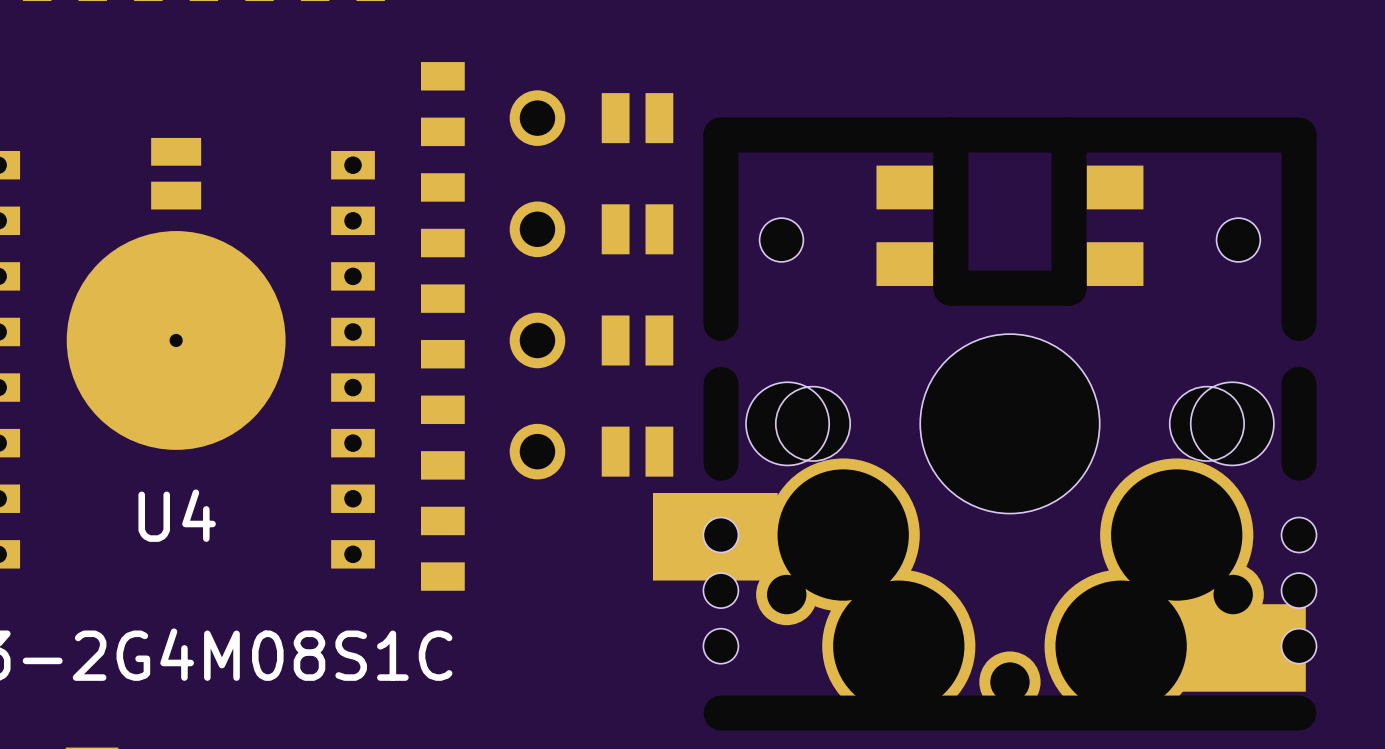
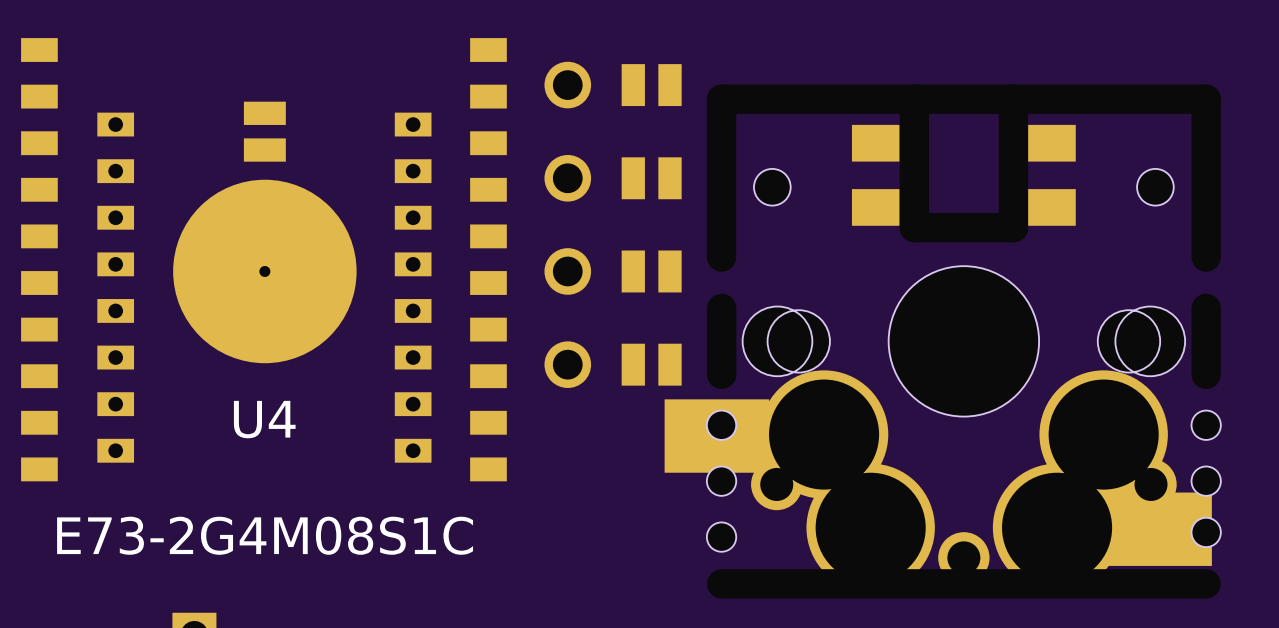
part footprint: [652, 117, 1317, 731] -> [664, 84, 1221, 599]

